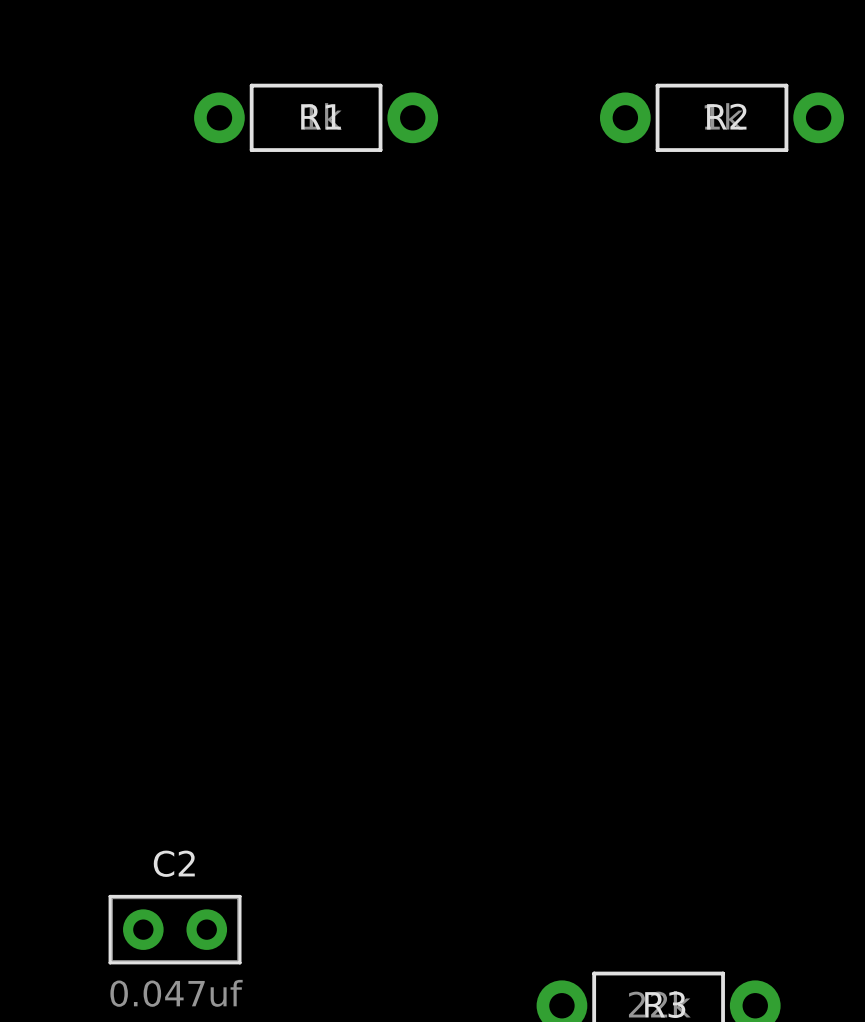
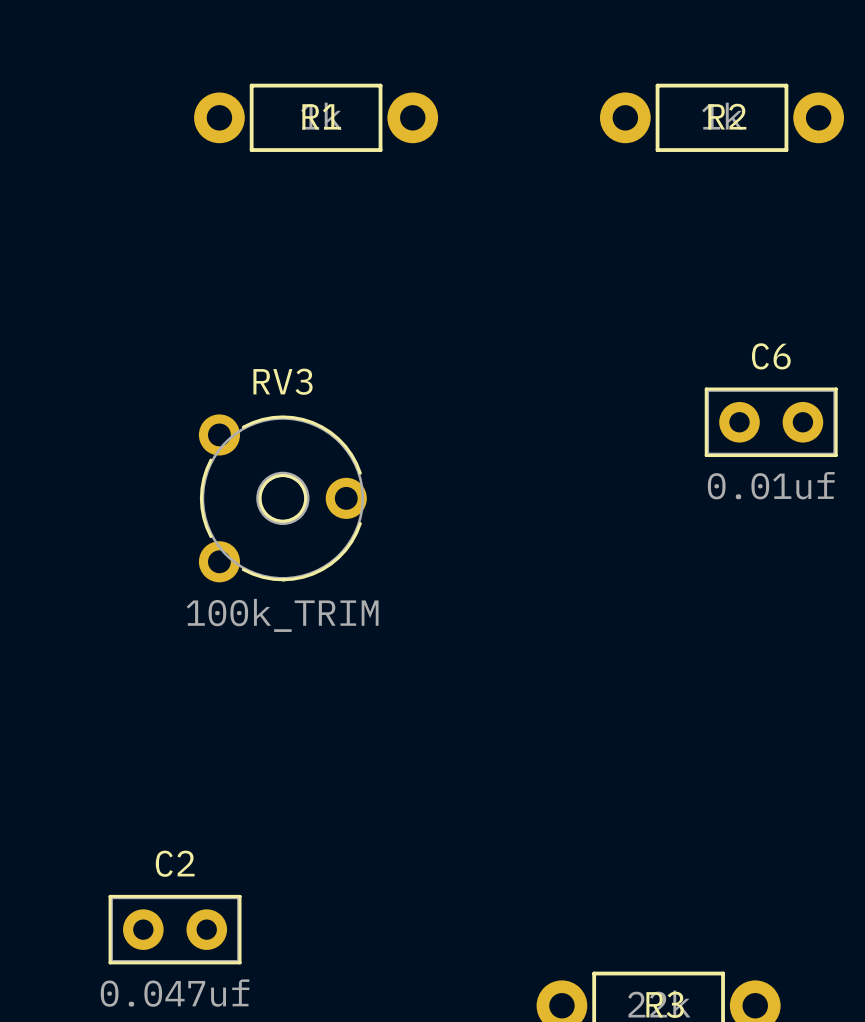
C6: none -> 0.01uf (771, 422)
RV3: none -> 100k_TRIM (282, 498)

